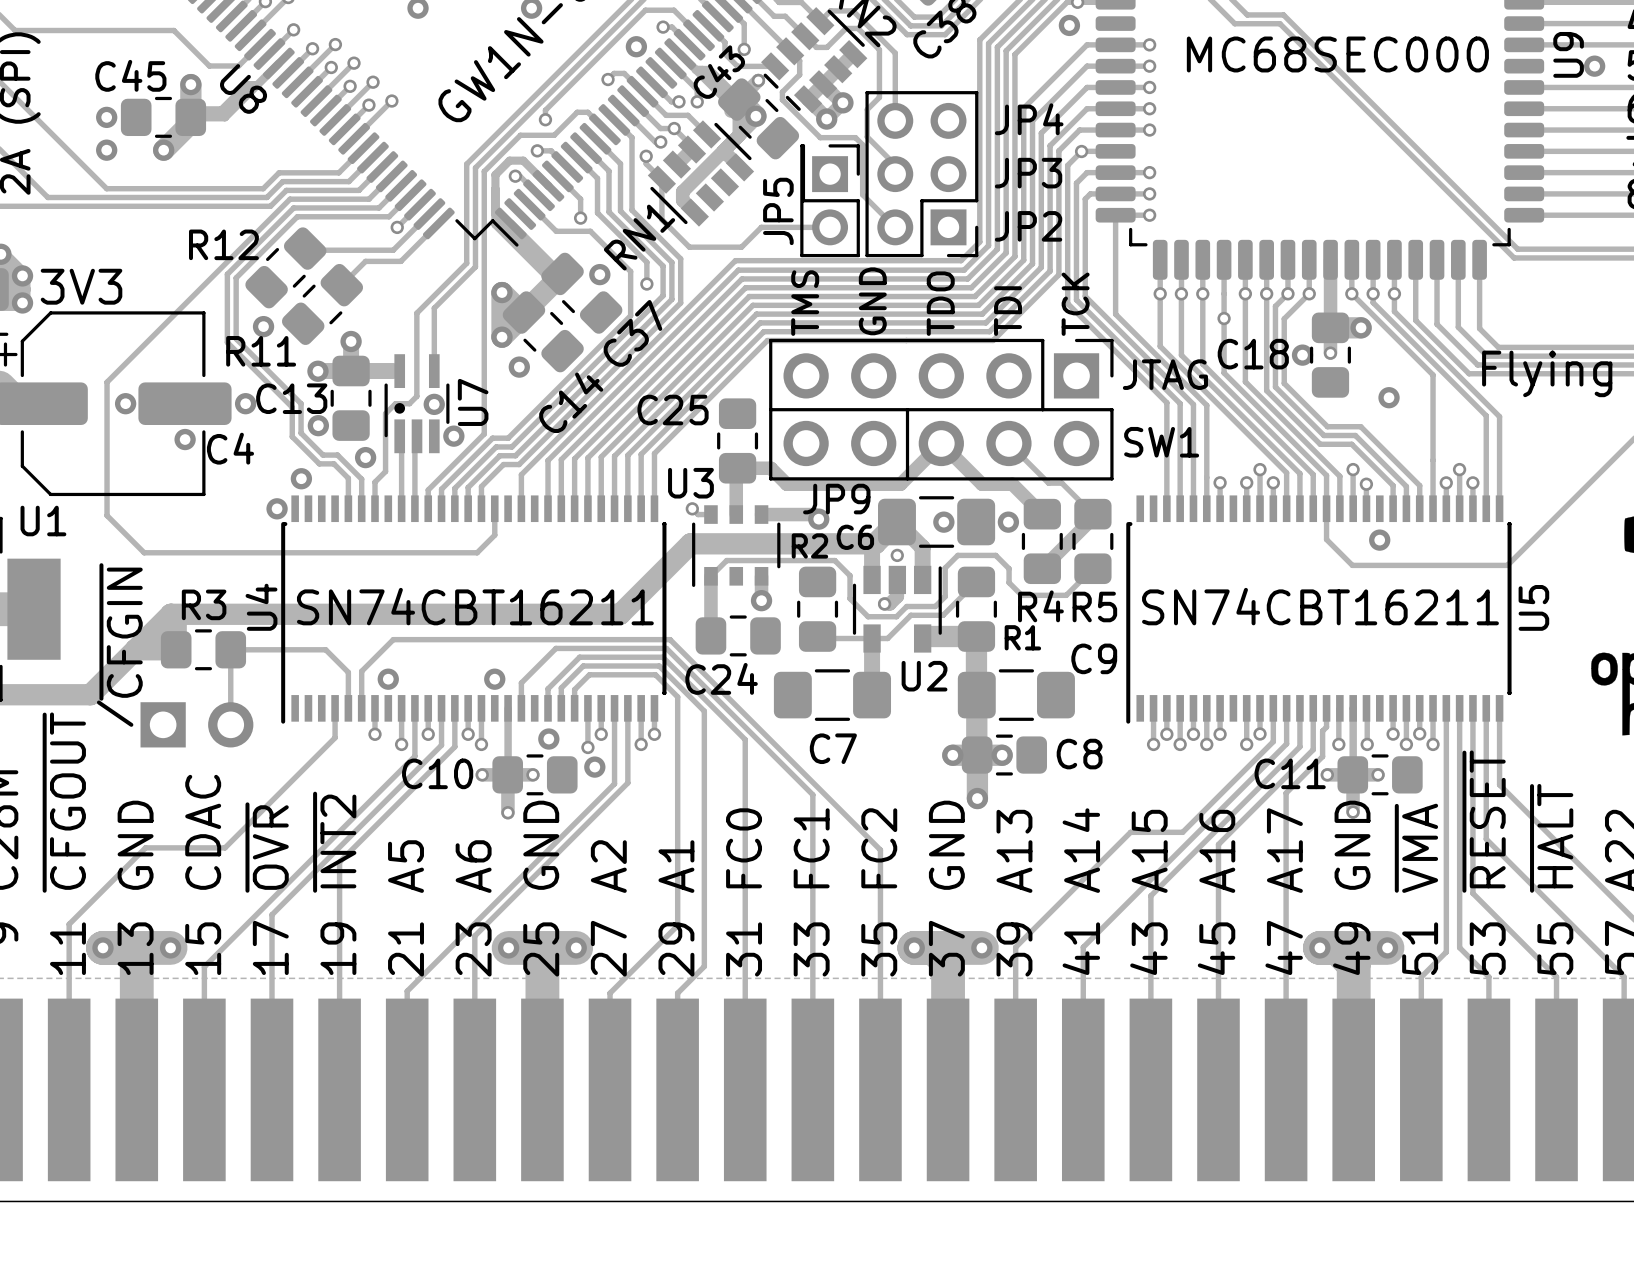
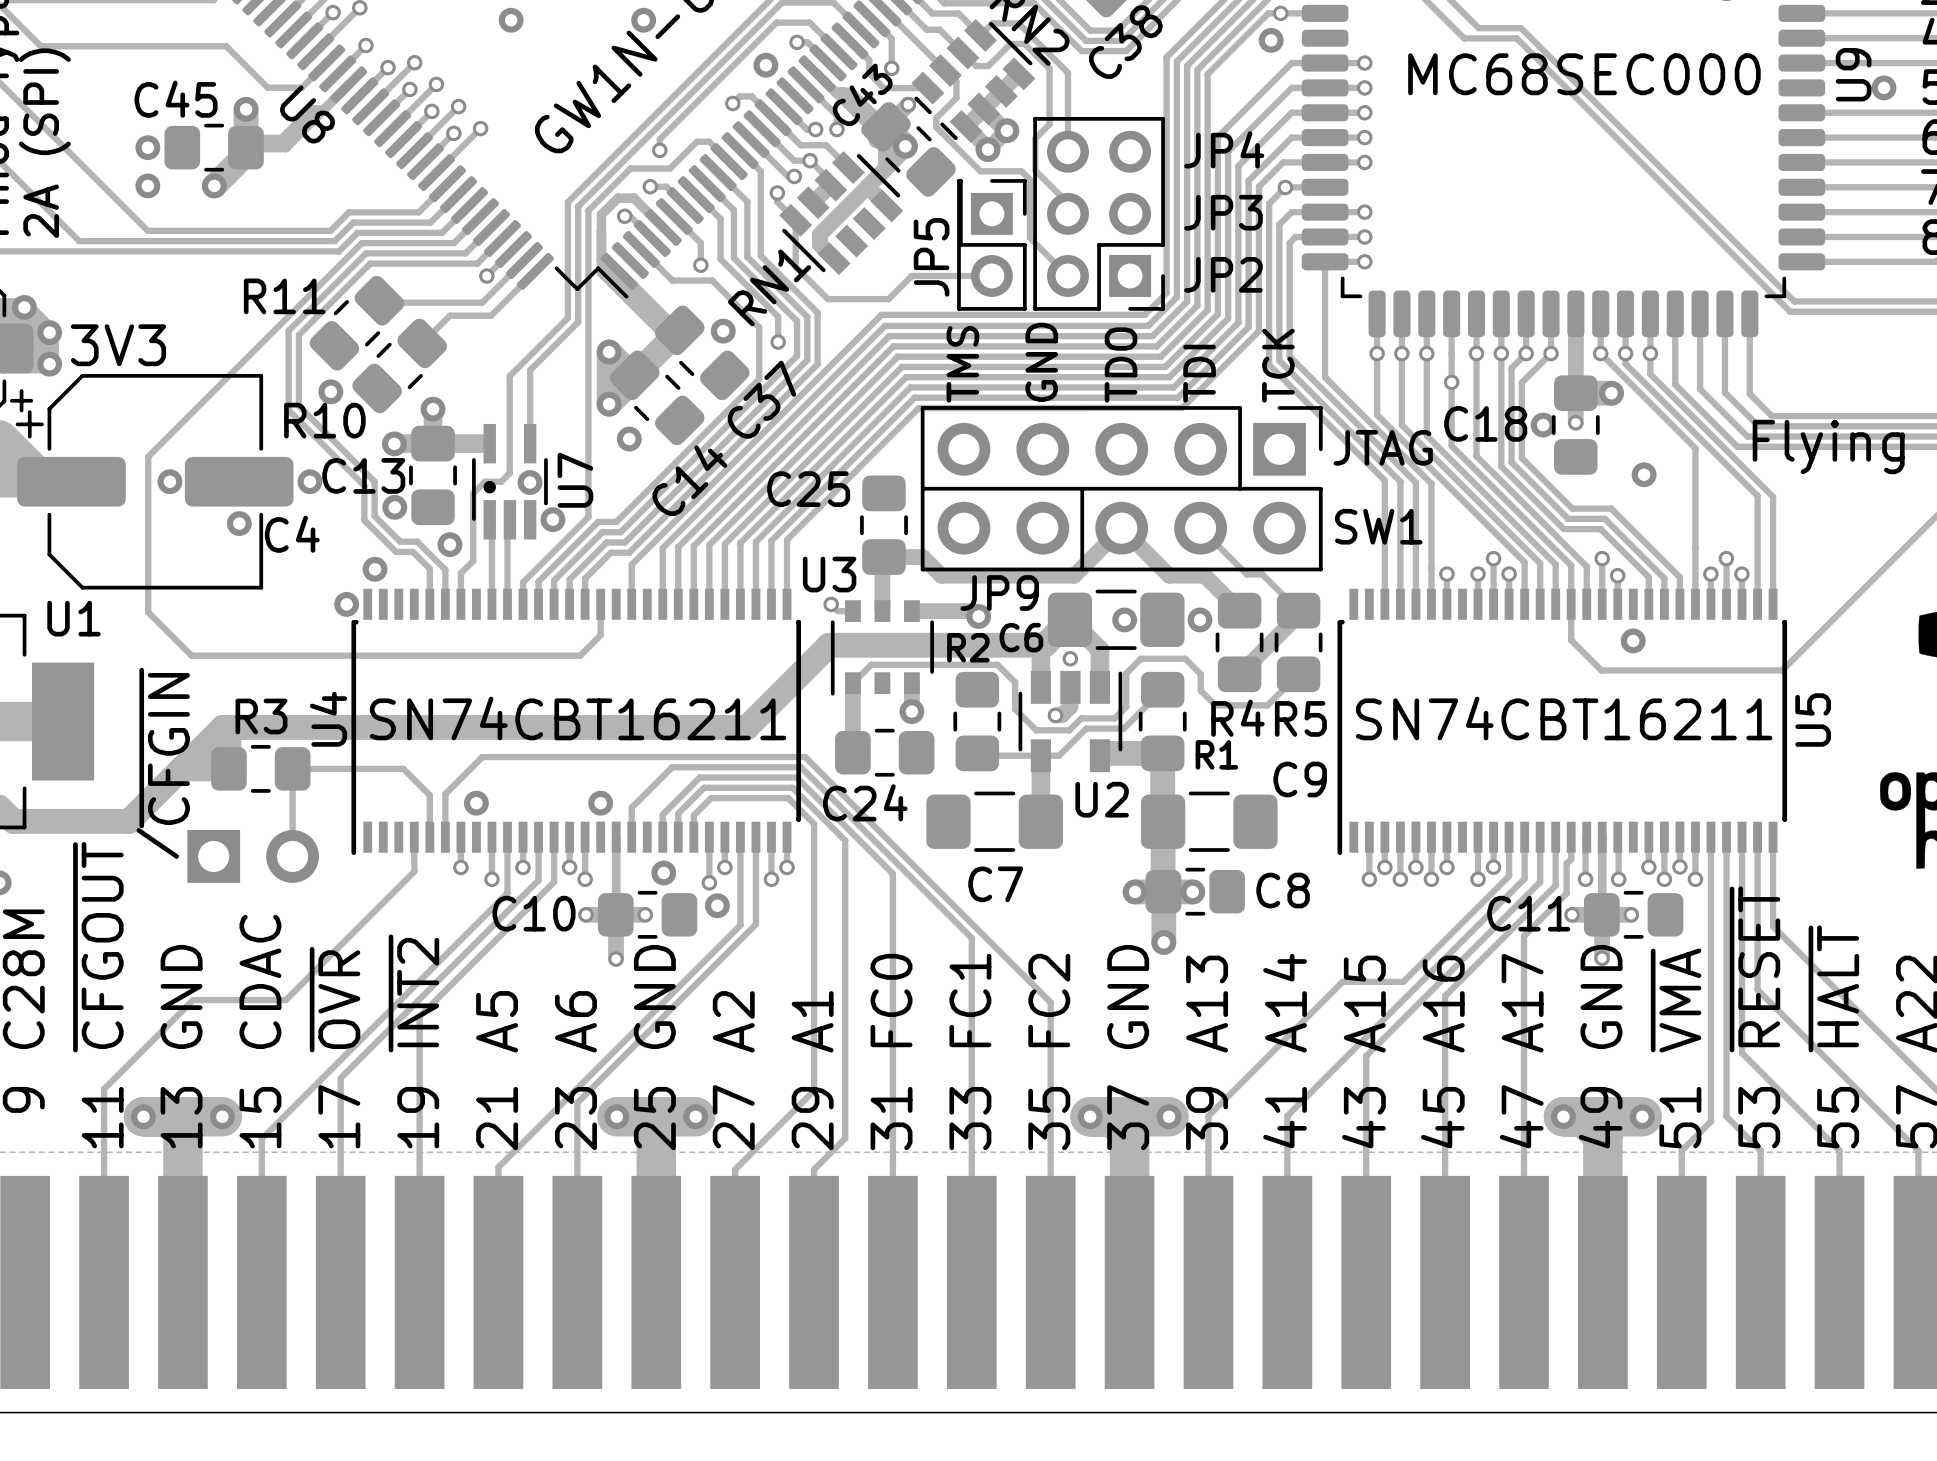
R12 name: R12 (223, 244) -> R11 (284, 296)
R11 name: R11 (261, 351) -> R10 (324, 420)

